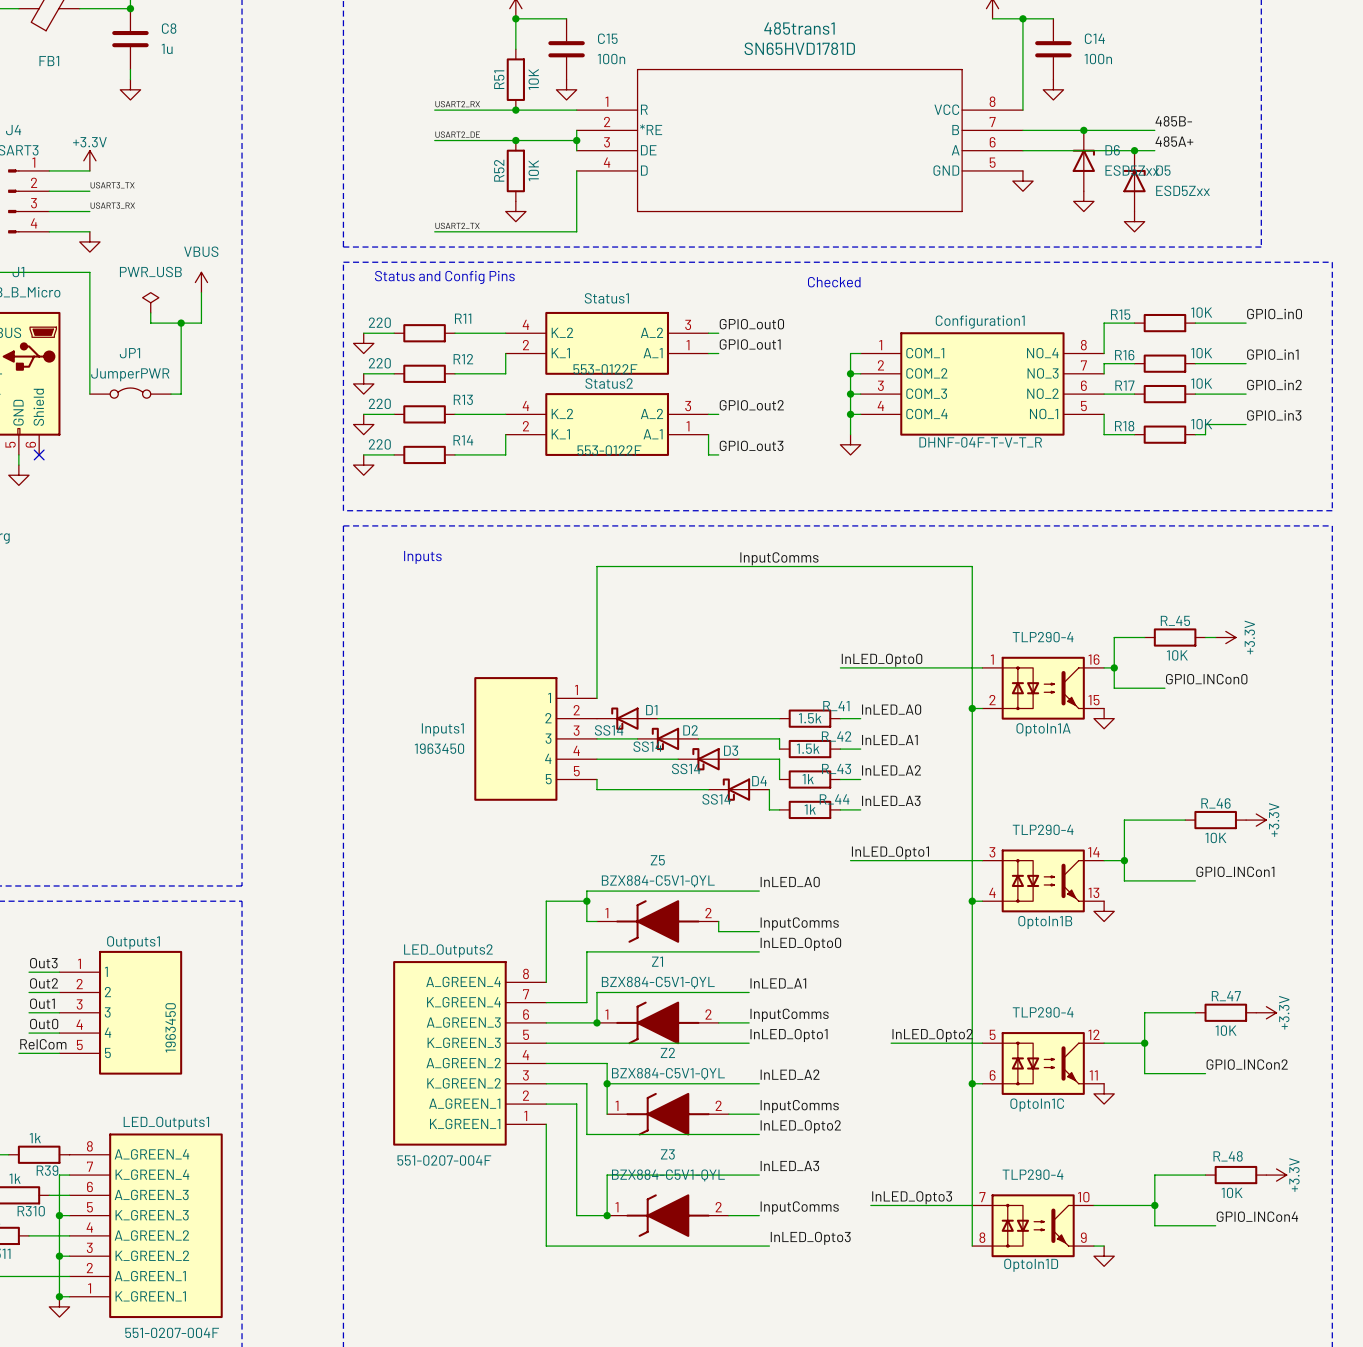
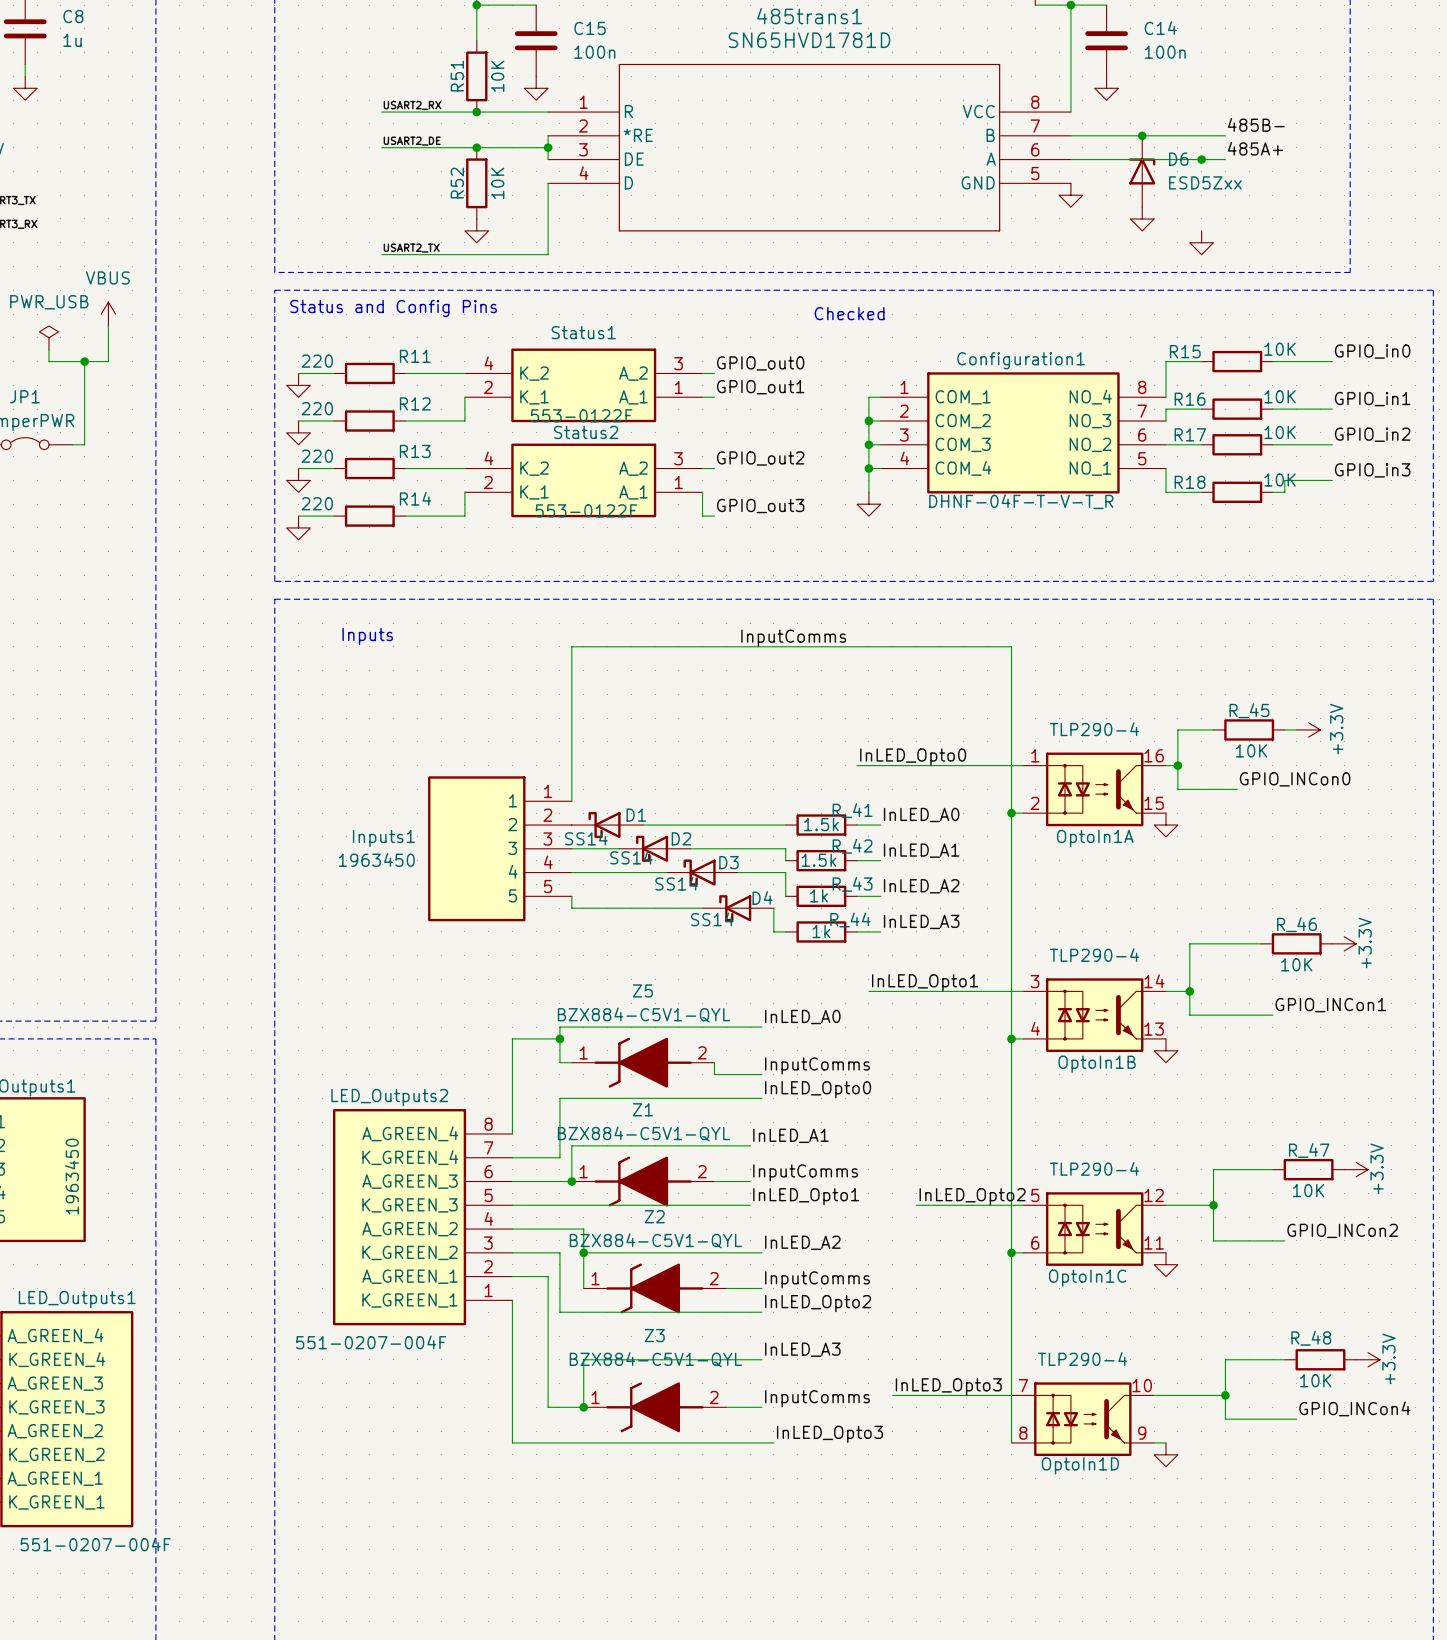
D5: ESD5Zxx (1134, 181) -> none

